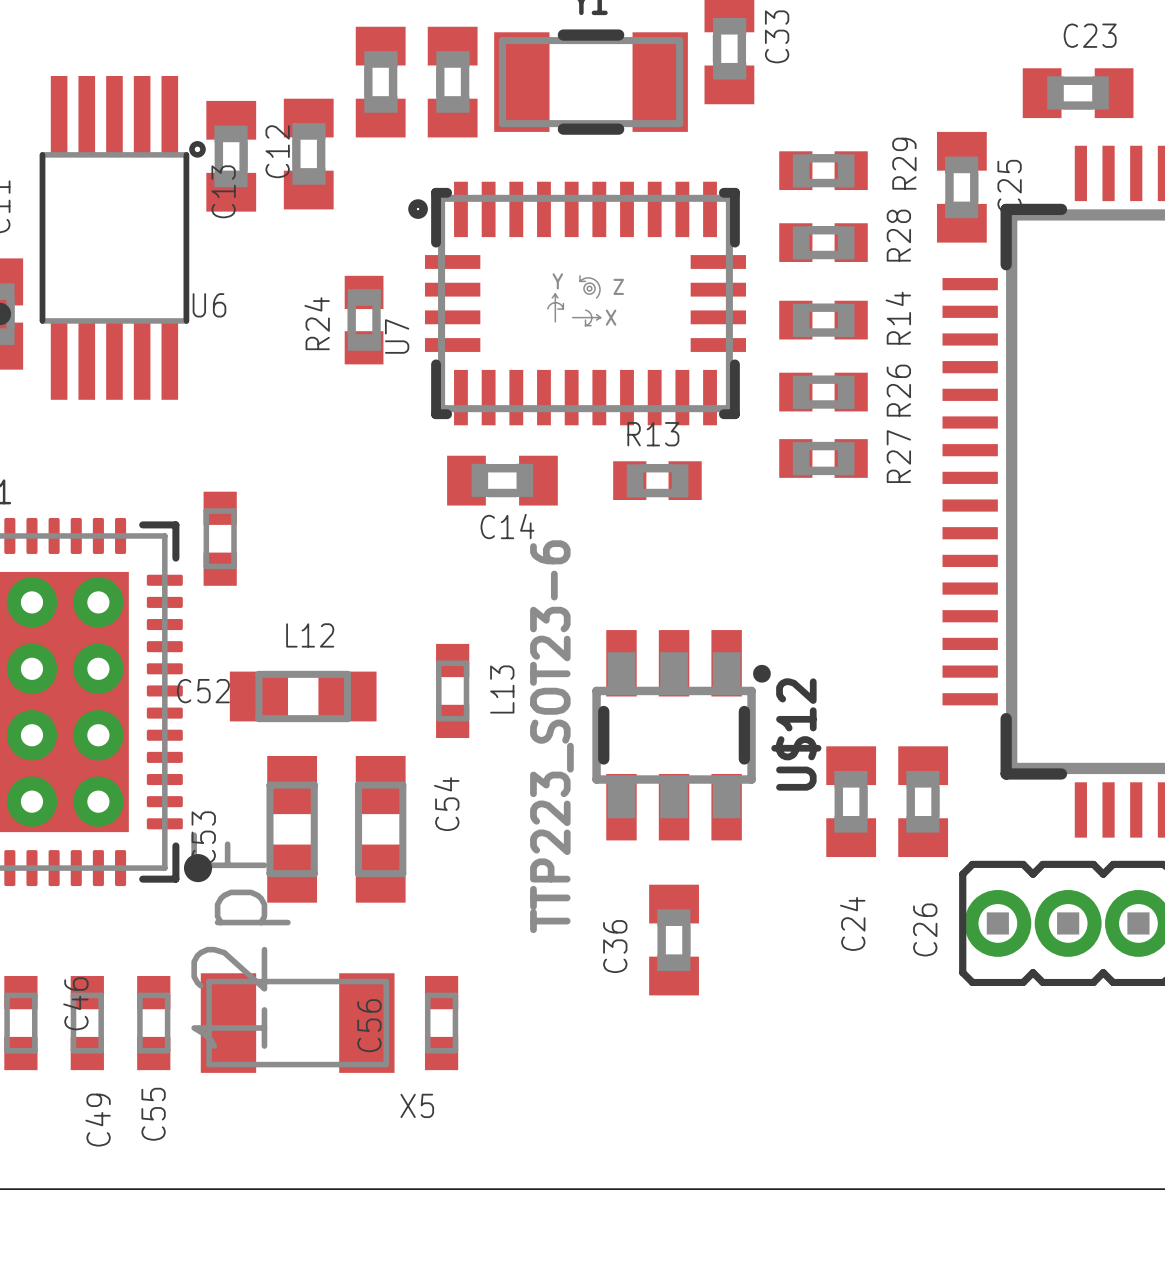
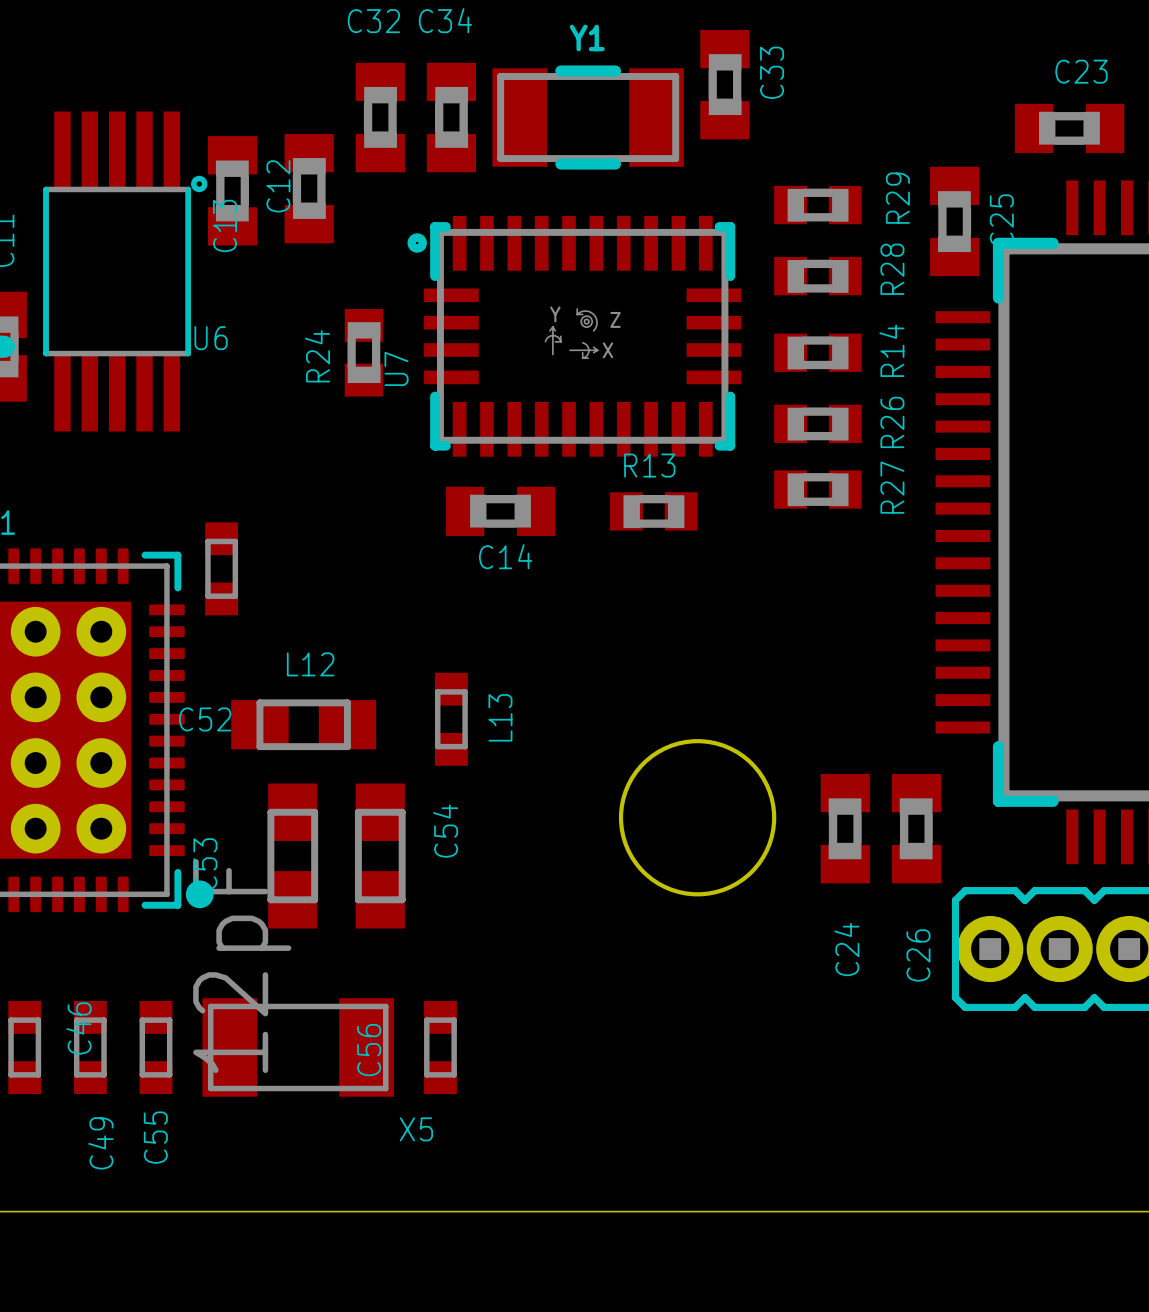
round board edge: none -> [618, 739, 777, 897]
U$12: TTP223_SOT23-6 (681, 735) -> none
C36: (674, 940) -> none

